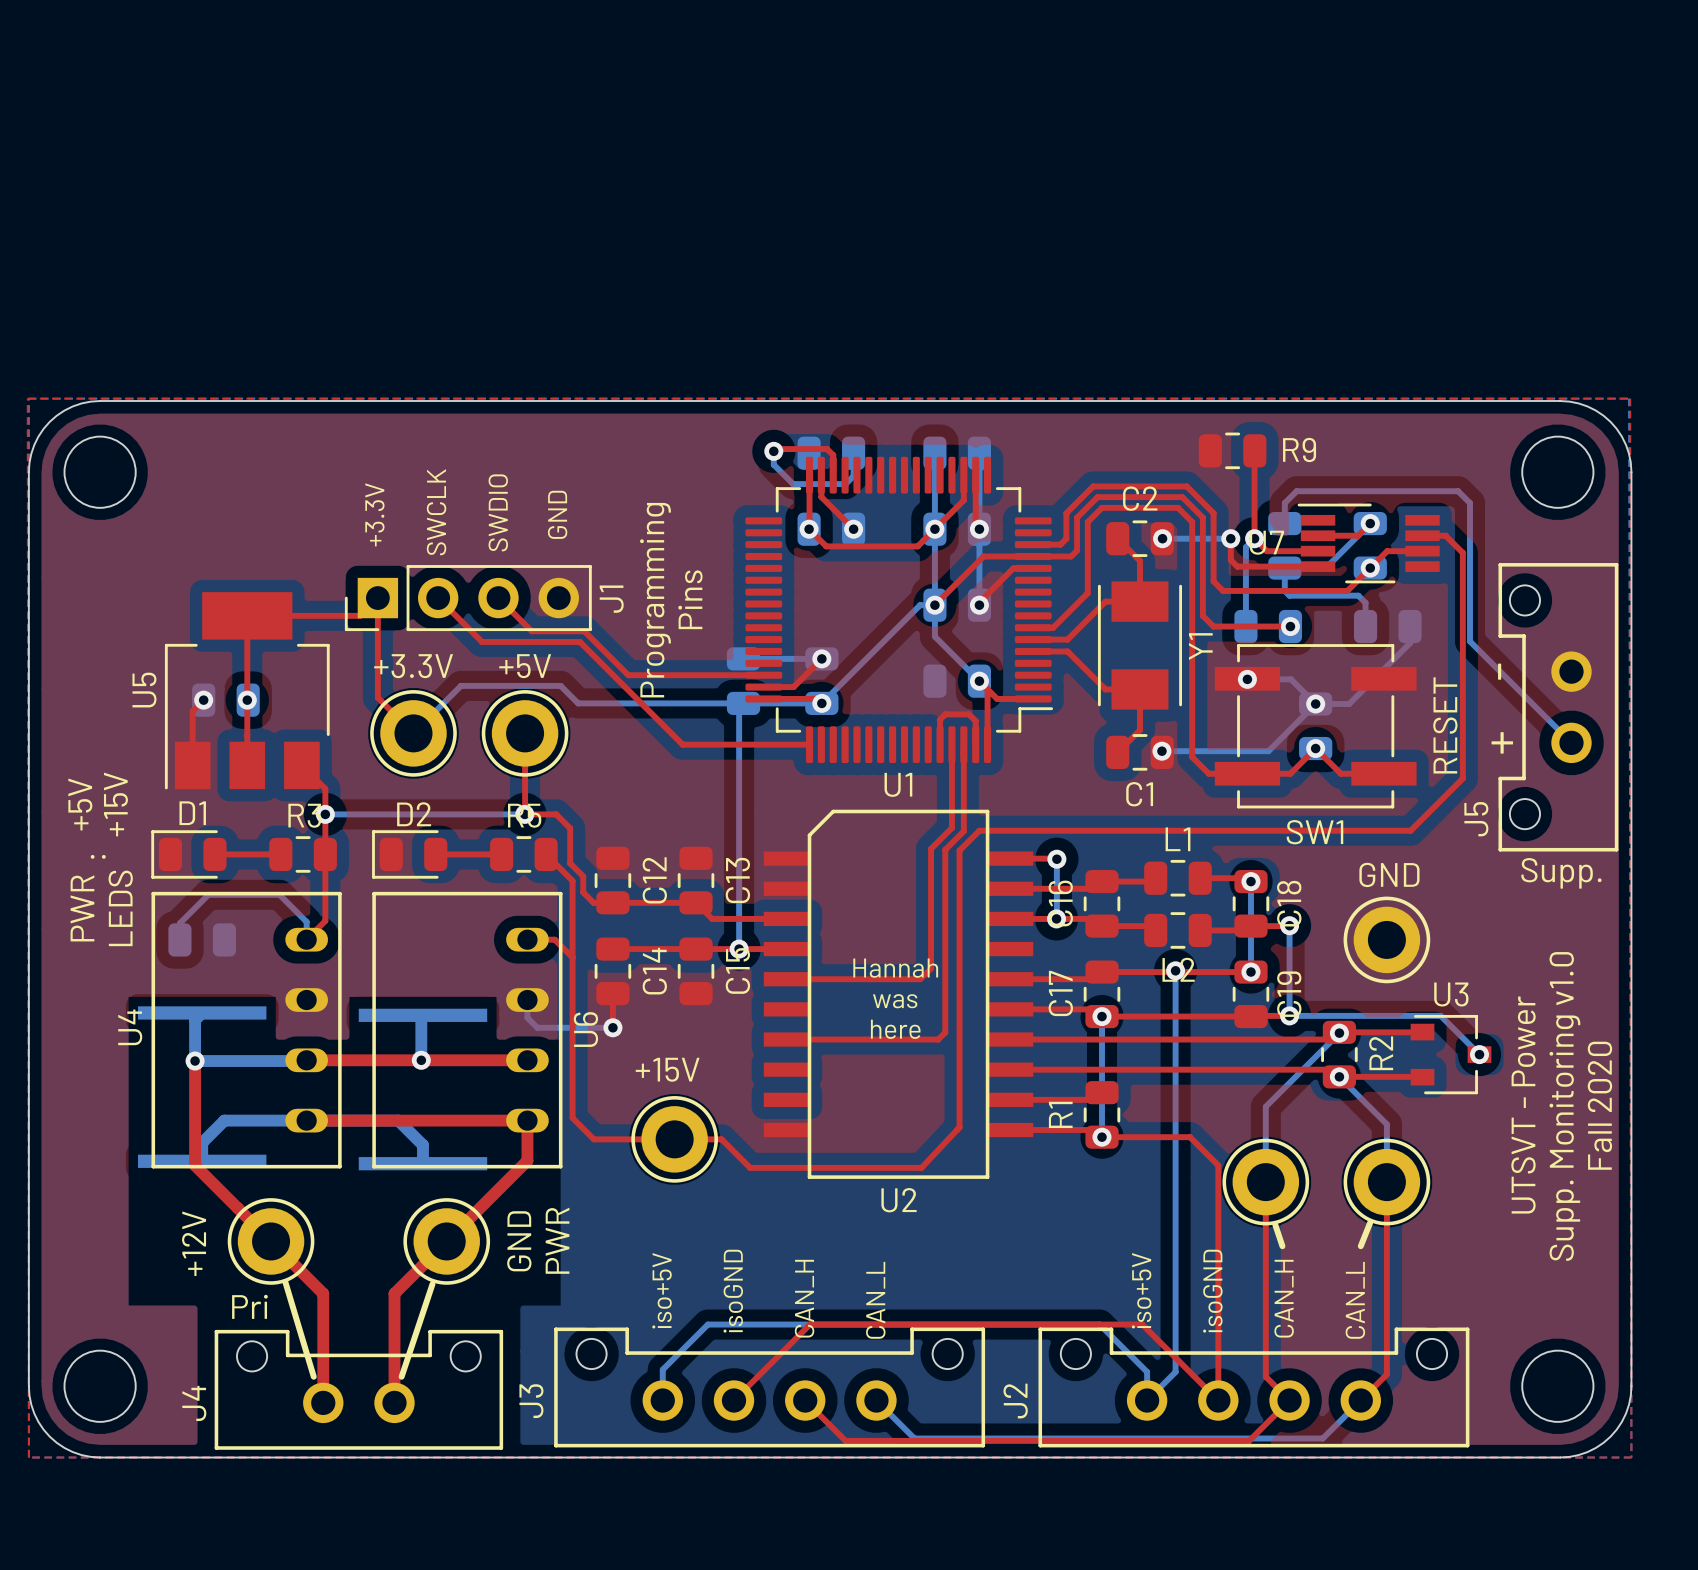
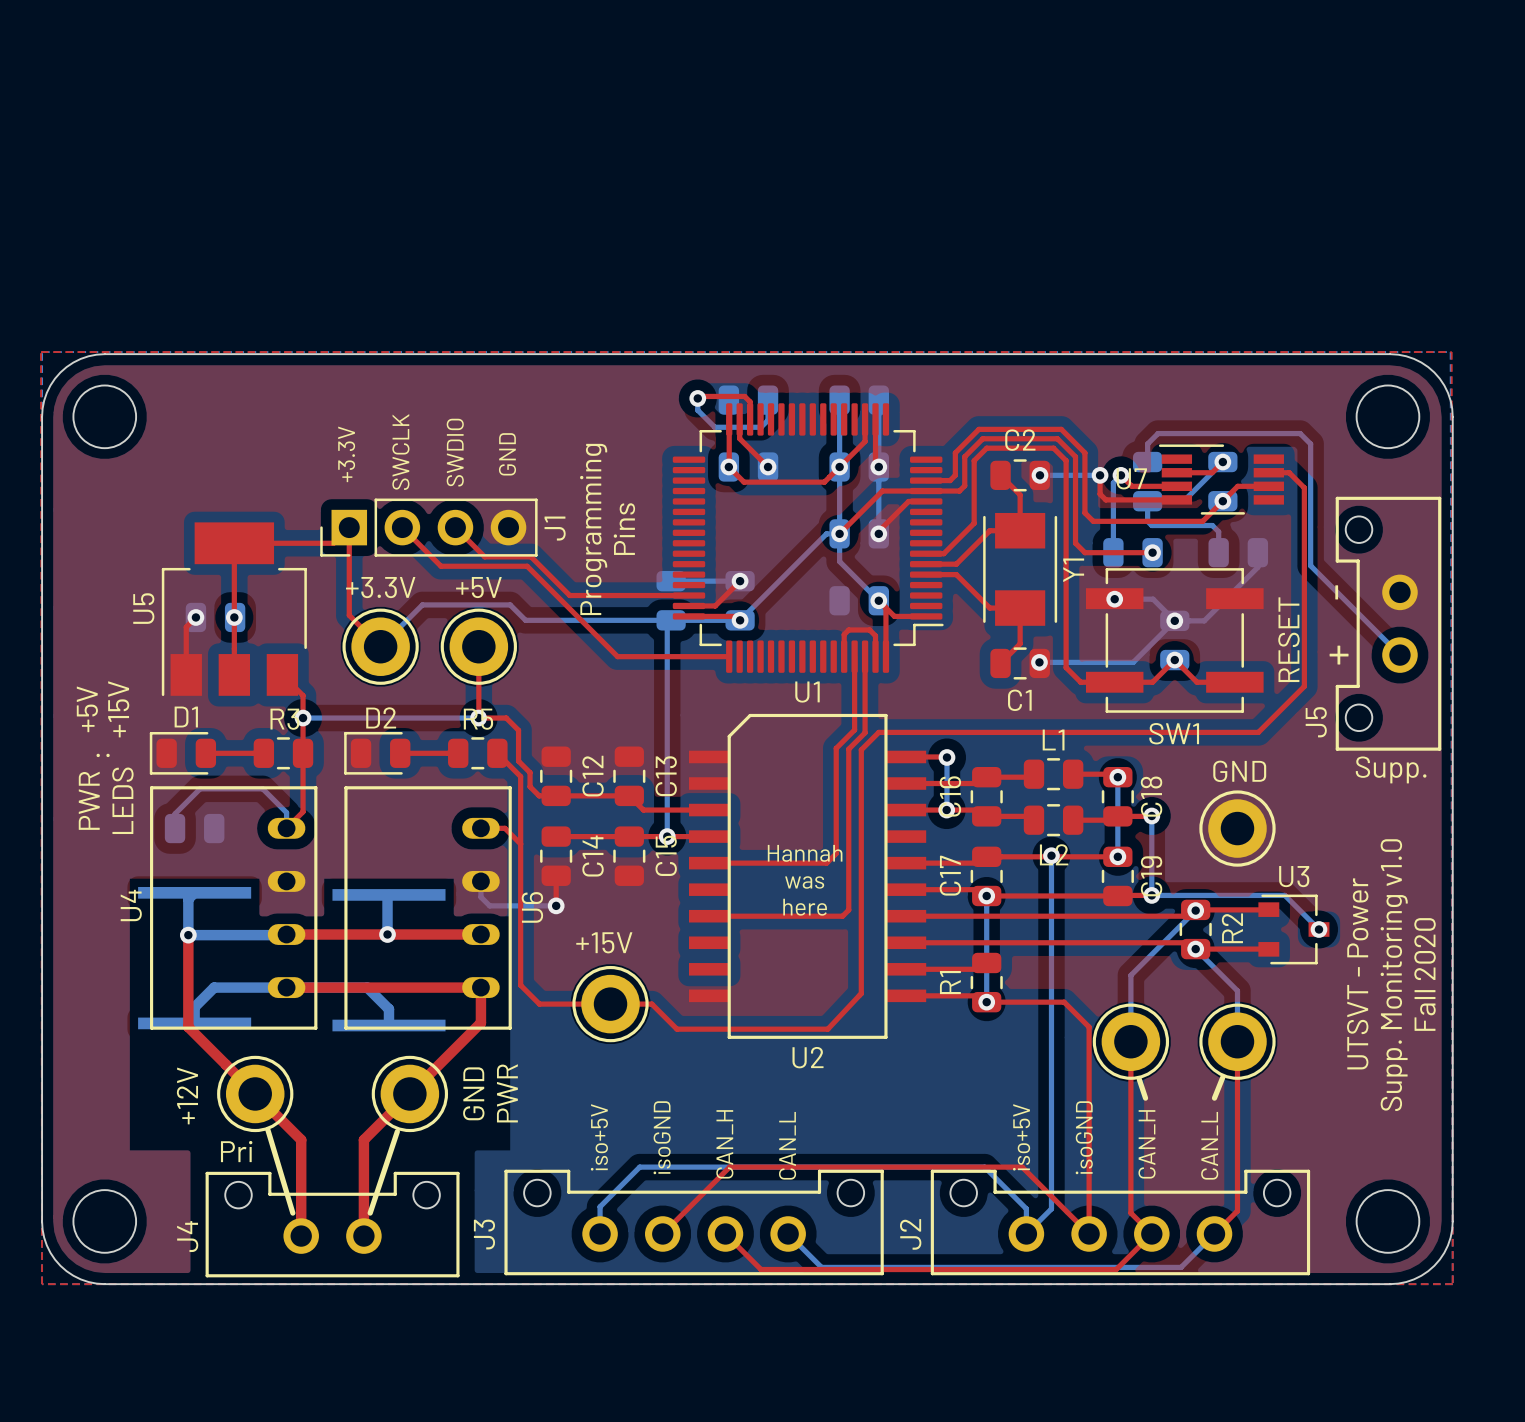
R9: (1232, 450) -> none
top track: (1254, 451) (1254, 538) -> none

